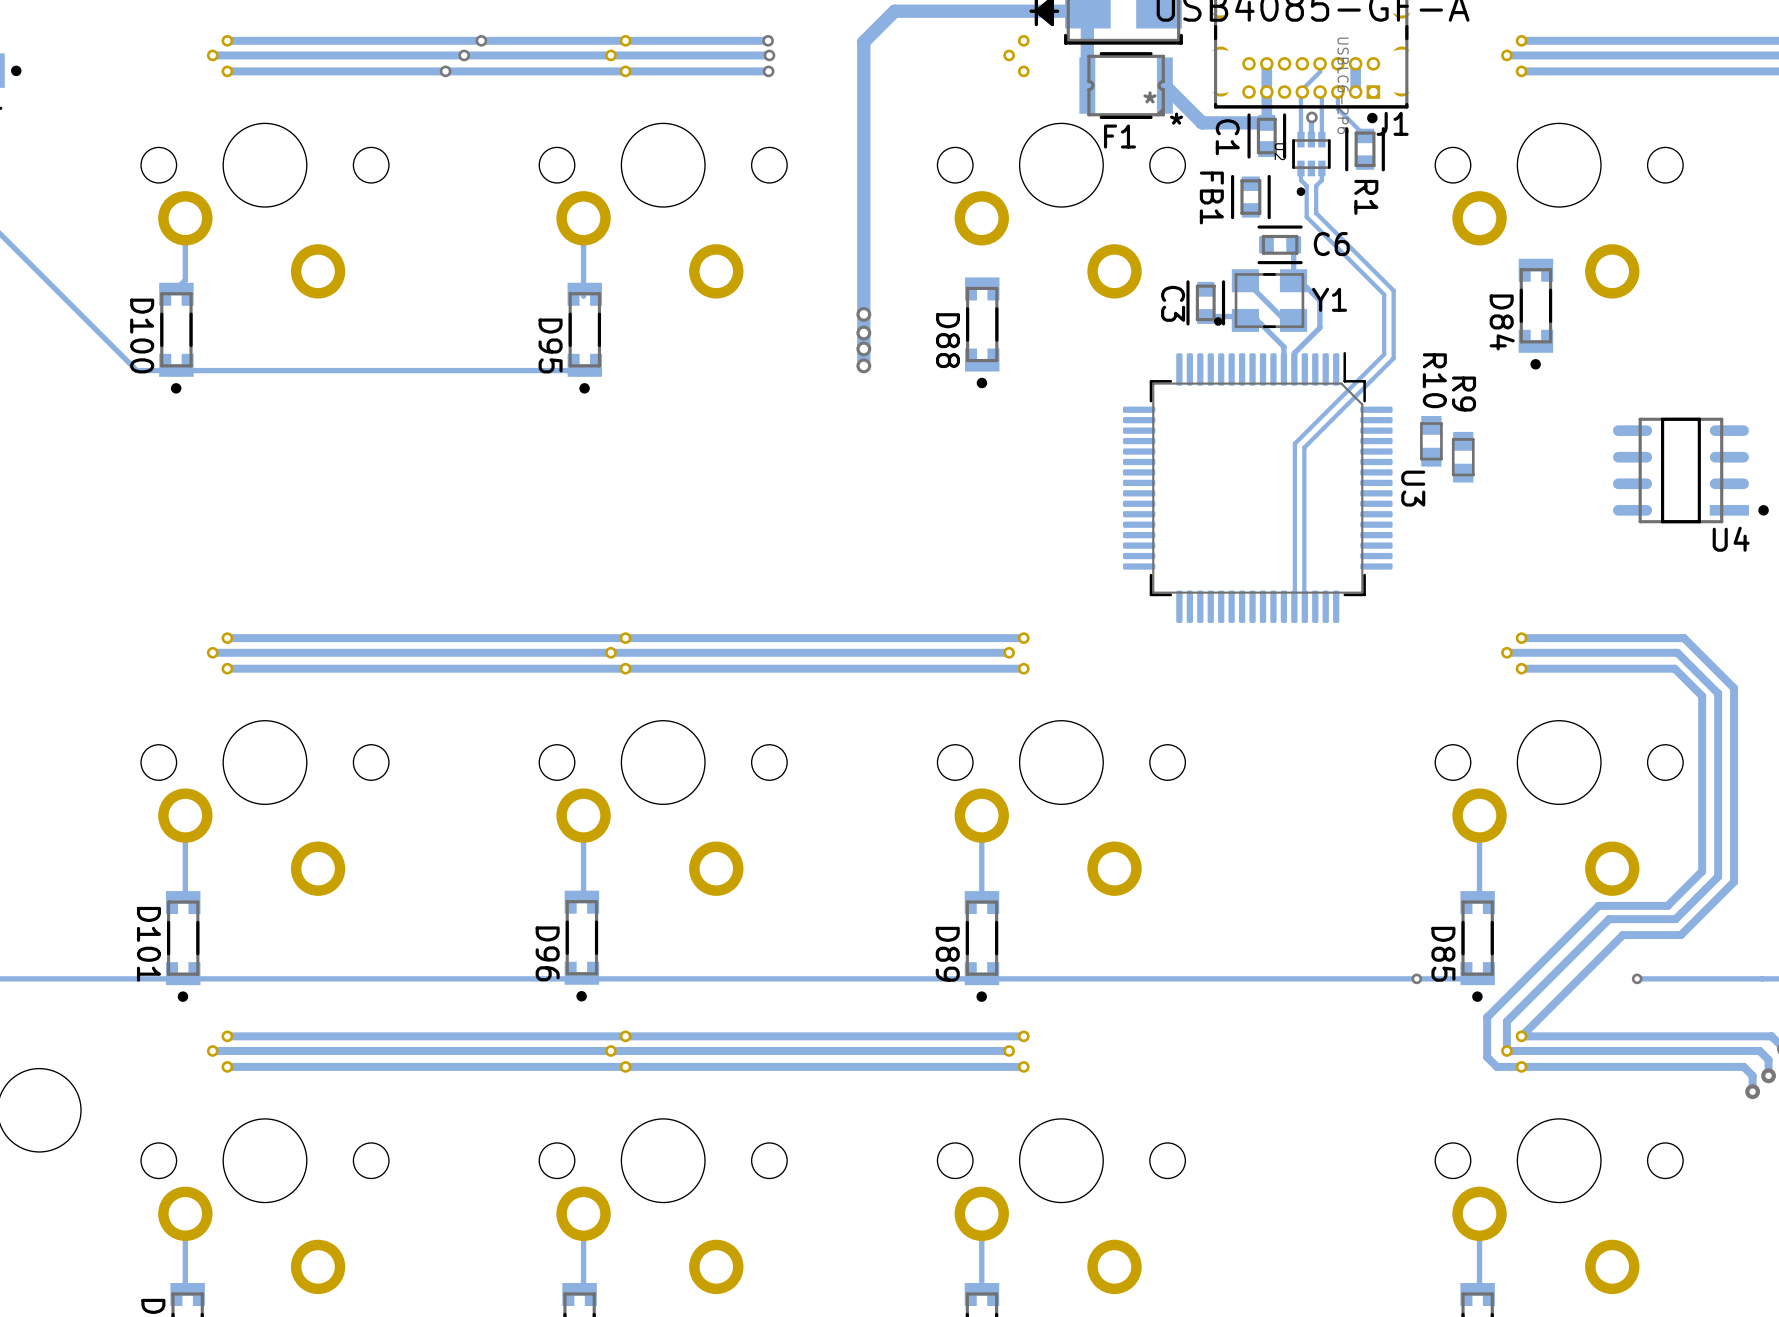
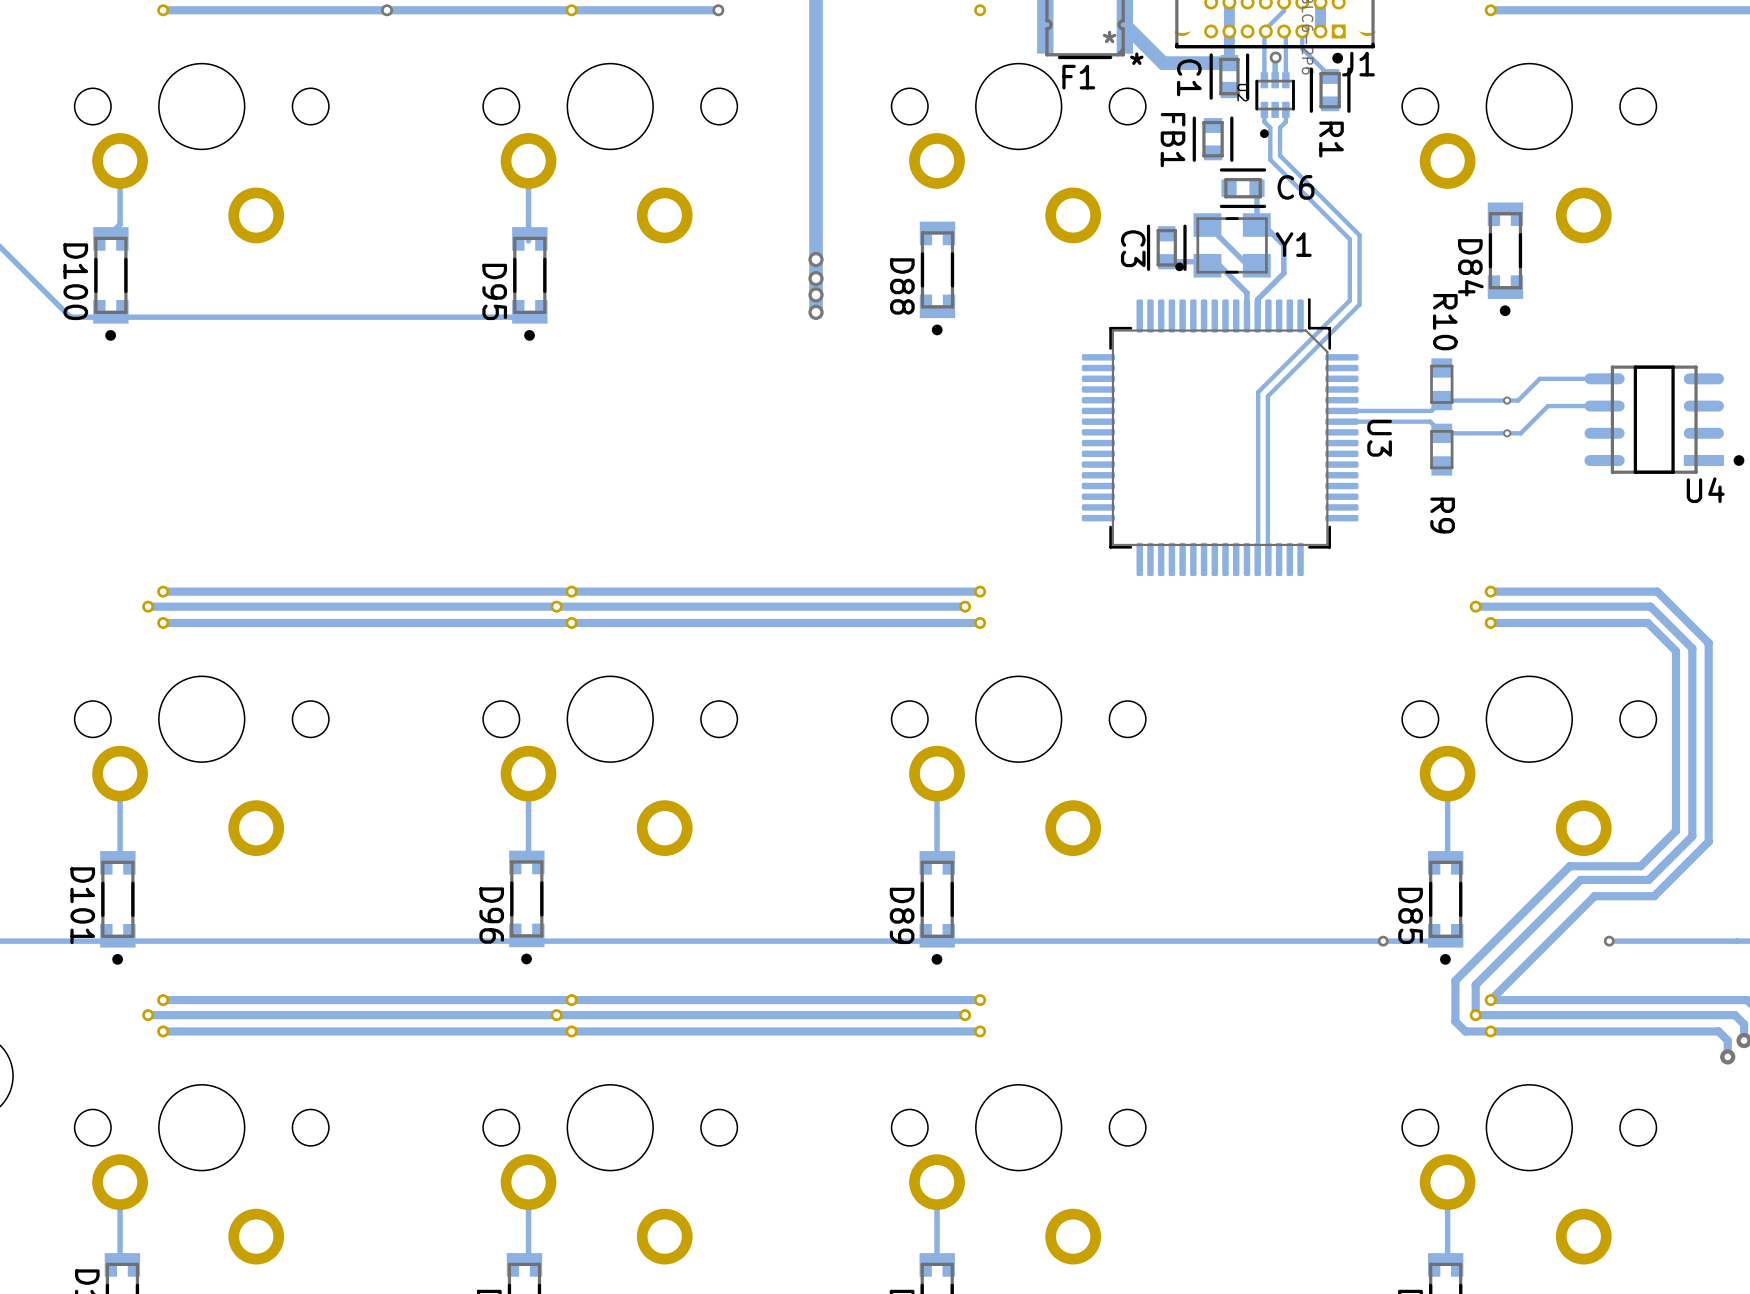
R9 name position: R9 (1464, 394) -> R9 (1442, 515)
track: none -> (1604, 378) (1539, 378) (1518, 400) (1441, 400) (1431, 410) (1341, 410)
R10 position: (1431, 441) -> (1441, 384)
via: none -> (1507, 400)
R9 position: (1463, 457) -> (1441, 449)
track: none -> (1604, 406) (1548, 406) (1520, 433) (1441, 433) (1430, 421) (1341, 421)
via: none -> (1507, 433)

